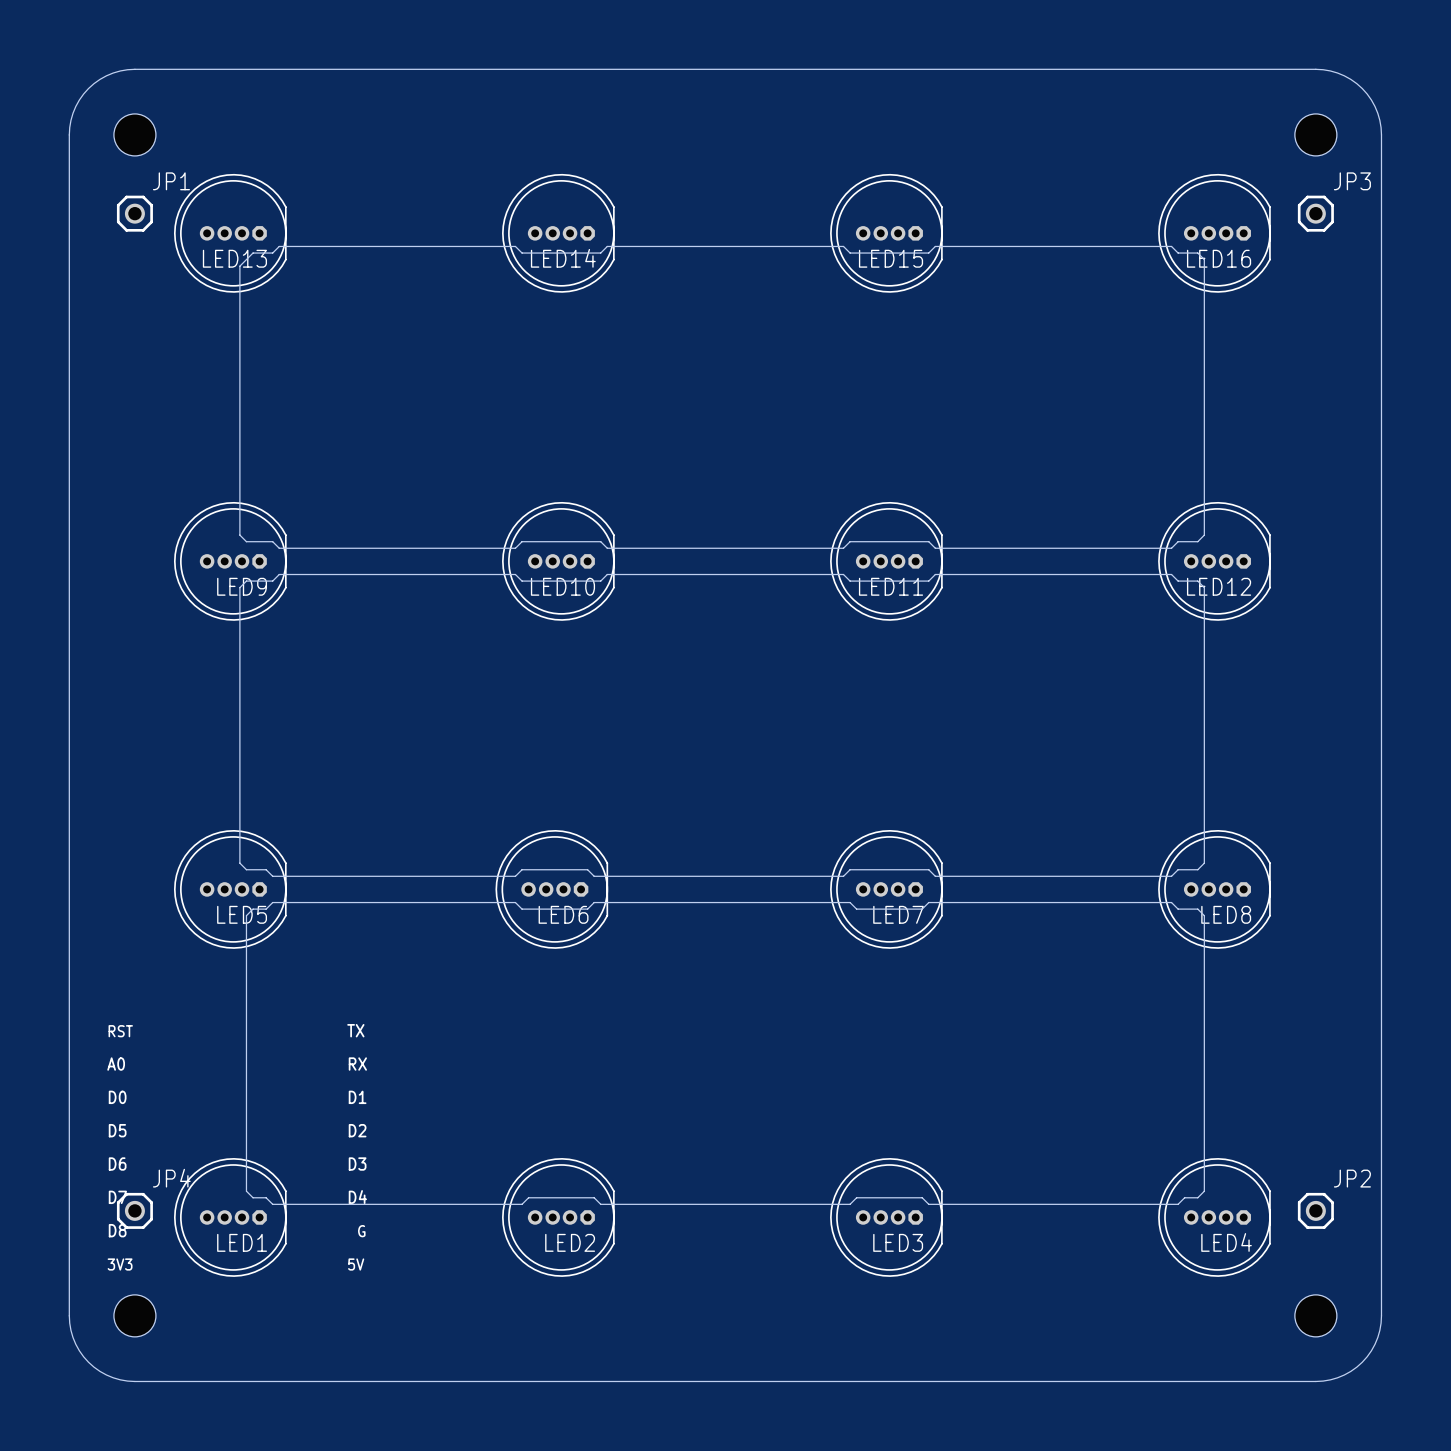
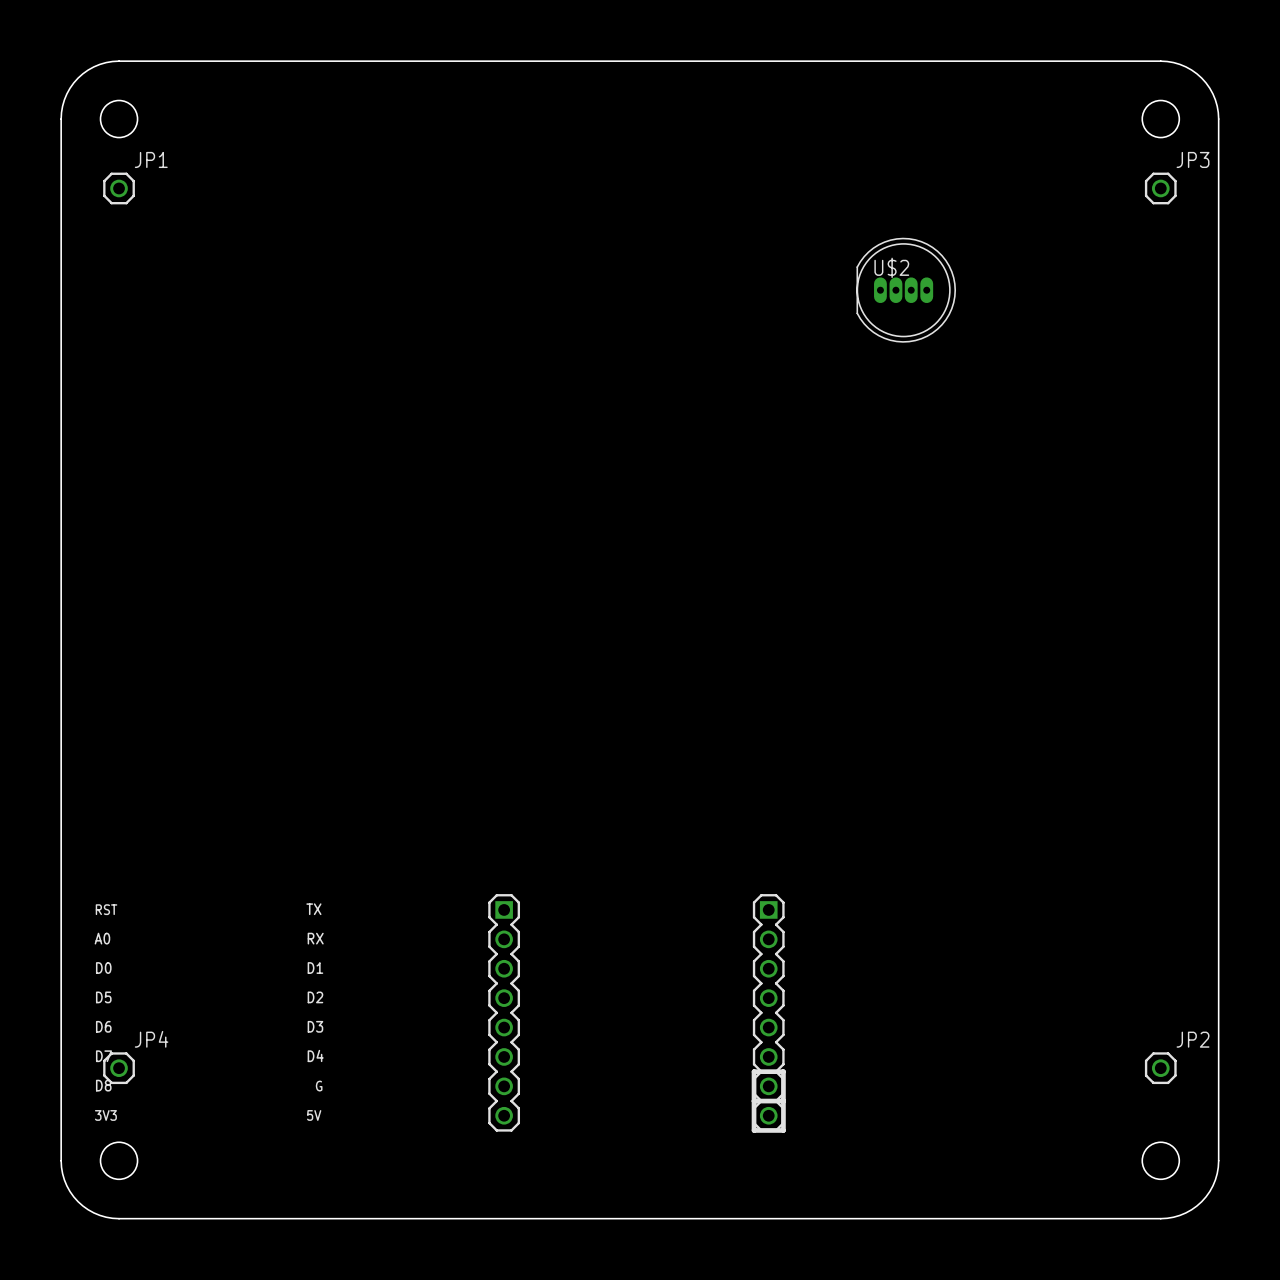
LED13: (230, 233) -> none
LED14: (558, 233) -> none
LED15: (886, 233) -> none
LED16: (1214, 233) -> none
board edge: (279, 246) (272, 253) (253, 253) (239, 266) (239, 535) (246, 541) (272, 541) (279, 548) (515, 548) (522, 541) (600, 541) (607, 548) (843, 548) (850, 541) (928, 541) (935, 548) (1171, 548) (1178, 541) (1197, 541) (1204, 535) (1204, 259) (1197, 253) (1178, 253) (1171, 246) (935, 246) (928, 253) (850, 253) (843, 246) (607, 246) (600, 253) (522, 253) (515, 246) (279, 246) -> none
U$2: none -> (906, 290)
LED9: (230, 561) -> none
LED10: (558, 561) -> none
LED11: (886, 561) -> none
LED12: (1214, 561) -> none
board edge: (279, 574) (272, 581) (246, 581) (239, 587) (239, 863) (246, 869) (266, 869) (272, 876) (515, 876) (522, 869) (587, 869) (594, 876) (843, 876) (850, 869) (928, 869) (935, 876) (1171, 876) (1178, 869) (1197, 869) (1204, 863) (1204, 587) (1197, 581) (1178, 581) (1171, 574) (935, 574) (928, 581) (850, 581) (843, 574) (607, 574) (600, 581) (522, 581) (515, 574) (279, 574) -> none
LED5: (230, 889) -> none
LED6: (551, 889) -> none
LED7: (886, 889) -> none
LED8: (1214, 889) -> none
board edge: (272, 902) (515, 902) (522, 909) (587, 909) (594, 902) (850, 902) (856, 909) (922, 909) (928, 902) (1171, 902) (1178, 909) (1197, 909) (1204, 915) (1204, 1191) (1197, 1197) (1184, 1197) (1178, 1204) (928, 1204) (922, 1197) (856, 1197) (850, 1204) (600, 1204) (594, 1197) (528, 1197) (522, 1204) (272, 1204) (266, 1197) (253, 1197) (246, 1191) (246, 915) (253, 909) (266, 909) (272, 902) -> none
part: none -> (504, 1012)
part: none -> (768, 1012)
line: none -> (754, 1071) (754, 1130) (783, 1130) (783, 1071) (754, 1071)
LED1: (230, 1217) -> none
LED2: (558, 1217) -> none
LED3: (886, 1217) -> none
LED4: (1214, 1217) -> none
line: none -> (754, 1101) (783, 1101)

